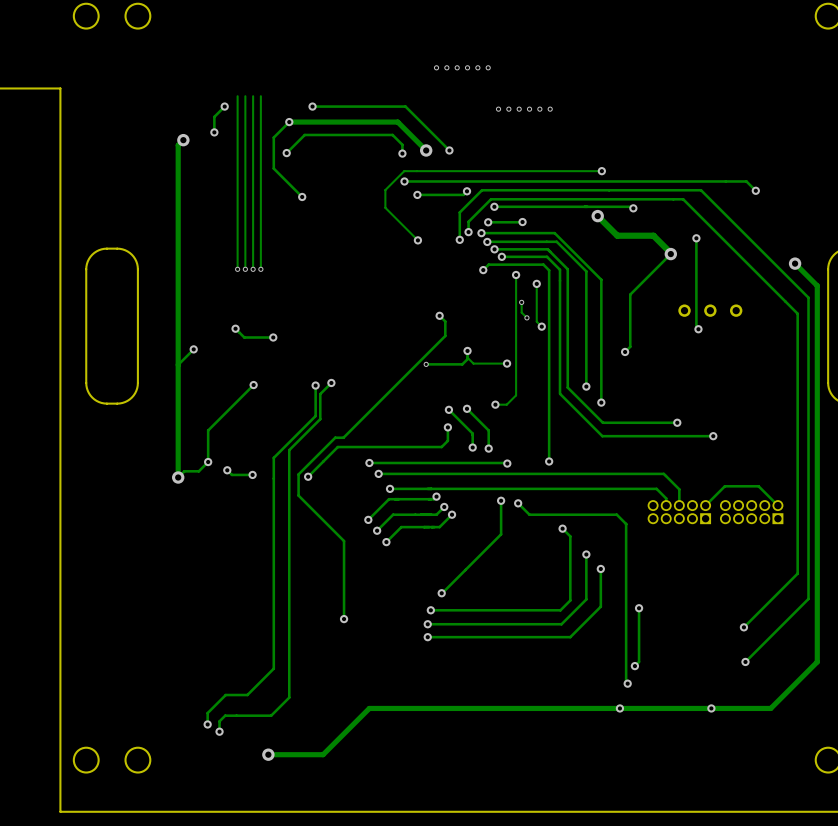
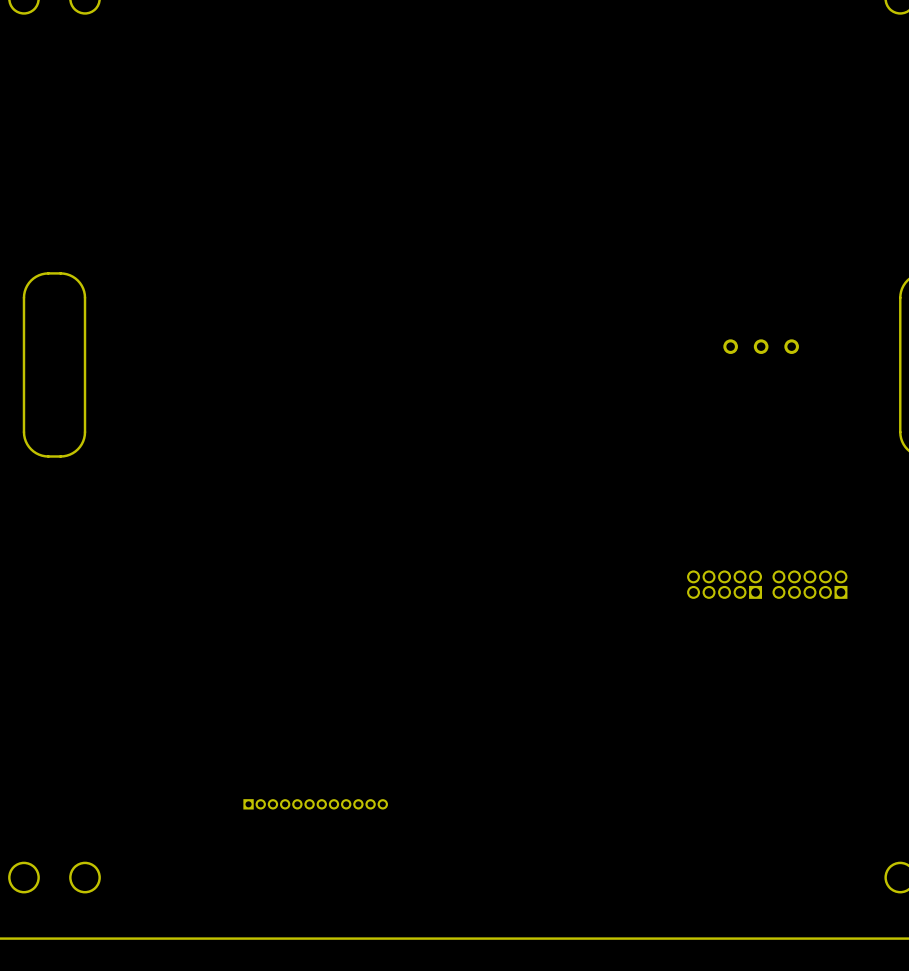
via: (436, 67) -> none
via: (446, 67) -> none
via: (457, 67) -> none
via: (467, 67) -> none
via: (477, 67) -> none
via: (488, 67) -> none
track: (237, 96) (237, 269) -> none
track: (245, 96) (245, 269) -> none
track: (253, 96) (253, 269) -> none
track: (260, 96) (260, 269) -> none
track: (224, 106) (214, 116) (214, 132) -> none
via: (224, 106) -> none
track: (312, 106) (405, 106) (449, 150) -> none
via: (312, 106) -> none
via: (498, 109) -> none
via: (508, 109) -> none
via: (519, 109) -> none
via: (529, 109) -> none
via: (539, 109) -> none
via: (550, 109) -> none
via: (289, 122) -> none
via: (214, 132) -> none
track: (183, 140) (178, 145) (178, 477) (184, 471) (198, 471) (208, 462) (208, 430) (253, 385) -> none
via: (183, 140) -> none
track: (426, 150) (397, 122) (289, 122) (273, 137) (273, 168) (302, 196) -> none
via: (426, 150) -> none
via: (449, 150) -> none
track: (286, 153) (304, 134) (392, 134) (402, 144) (402, 153) -> none
via: (286, 153) -> none
via: (402, 153) -> none
track: (601, 171) (404, 171) (385, 190) (385, 207) (417, 240) -> none
via: (601, 171) -> none
track: (404, 181) (746, 181) (755, 190) -> none
via: (404, 181) -> none
via: (755, 190) -> none
track: (467, 191) (463, 194) (417, 194) -> none
via: (467, 191) -> none
via: (417, 194) -> none
via: (302, 196) -> none
track: (494, 206) (631, 206) (633, 208) -> none
via: (494, 206) -> none
via: (633, 208) -> none
track: (597, 215) (617, 235) (653, 235) (670, 253) (630, 294) (630, 346) (625, 351) -> none
via: (597, 216) -> none
via: (488, 222) -> none
track: (522, 222) (488, 222) -> none
via: (522, 222) -> none
track: (468, 232) (468, 221) (491, 199) (683, 199) (797, 313) (797, 573) (743, 627) -> none
via: (468, 232) -> none
track: (481, 233) (554, 233) (601, 279) (601, 402) -> none
via: (481, 233) -> none
track: (696, 238) (696, 327) (698, 329) -> none
via: (696, 238) -> none
track: (459, 239) (459, 212) (481, 190) (701, 190) (808, 297) (808, 598) (745, 661) -> none
via: (459, 239) -> none
via: (417, 240) -> none
track: (487, 241) (556, 241) (586, 271) (586, 386) -> none
via: (487, 241) -> none
track: (494, 249) (547, 249) (567, 269) (567, 387) (602, 422) (677, 422) -> none
via: (494, 249) -> none
via: (670, 254) -> none
track: (501, 256) (547, 256) (560, 269) (560, 393) -> none
via: (501, 256) -> none
track: (795, 263) (817, 285) (817, 661) (770, 708) (369, 708) (323, 754) (268, 754) -> none
via: (795, 263) -> none
via: (237, 269) -> none
via: (245, 269) -> none
via: (253, 269) -> none
via: (260, 269) -> none
track: (483, 270) (488, 264) (543, 264) (549, 270) (549, 461) -> none
via: (483, 270) -> none
track: (516, 274) (516, 395) (506, 404) (495, 404) -> none
via: (516, 274) -> none
track: (536, 283) (536, 321) (541, 326) -> none
via: (536, 283) -> none
track: (521, 302) (521, 312) (526, 317) -> none
via: (521, 302) -> none
track: (439, 315) (445, 321) (445, 335) (343, 437) (335, 437) (298, 474) (298, 495) (344, 541) (344, 619) -> none
via: (439, 315) -> none
via: (526, 317) -> none
via: (541, 326) -> none
track: (235, 328) (244, 337) (273, 337) -> none
via: (235, 328) -> none
via: (698, 329) -> none
via: (273, 337) -> none
track: (193, 349) (178, 364) -> none
via: (193, 349) -> none
via: (467, 350) -> none
via: (625, 351) -> none
track: (507, 363) (473, 363) (467, 357) (467, 350) (467, 359) (462, 364) (426, 364) -> none
via: (507, 363) -> none
via: (426, 364) -> none
track: (331, 382) (320, 394) (320, 419) (289, 450) (289, 697) (271, 715) (225, 715) (219, 721) (219, 731) -> none
via: (331, 382) -> none
via: (253, 385) -> none
track: (315, 385) (315, 416) (273, 457) (273, 668) (247, 695) (225, 695) (207, 713) (207, 724) -> none
via: (315, 385) -> none
via: (586, 386) -> none
track: (560, 394) (602, 436) (713, 436) -> none
via: (601, 402) -> none
via: (495, 404) -> none
track: (467, 408) (488, 430) (488, 448) -> none
via: (467, 408) -> none
track: (448, 409) (472, 433) (472, 447) -> none
via: (448, 409) -> none
via: (677, 422) -> none
track: (447, 427) (447, 440) (441, 447) (337, 447) (308, 476) -> none
via: (447, 427) -> none
via: (713, 436) -> none
via: (472, 447) -> none
via: (488, 448) -> none
via: (549, 461) -> none
via: (208, 462) -> none
track: (369, 462) (507, 463) -> none
via: (369, 462) -> none
via: (507, 463) -> none
track: (227, 470) (231, 474) (252, 474) -> none
via: (227, 470) -> none
track: (378, 473) (663, 473) (679, 489) (679, 505) -> none
via: (378, 473) -> none
via: (252, 474) -> none
via: (308, 476) -> none
via: (178, 477) -> none
track: (390, 488) (656, 488) (666, 498) (666, 505) -> none
via: (390, 488) -> none
track: (436, 496) (433, 499) (389, 499) (368, 519) -> none
via: (436, 496) -> none
track: (501, 500) (501, 534) (441, 593) -> none
via: (501, 500) -> none
track: (518, 503) (529, 514) (616, 514) (626, 524) (626, 682) (627, 683) -> none
via: (518, 503) -> none
track: (777, 505) (758, 486) (724, 486) (705, 505) -> none
track: (444, 506) (436, 514) (393, 514) (377, 530) -> none
via: (444, 506) -> none
track: (452, 514) (439, 527) (401, 527) (386, 542) -> none
via: (452, 514) -> none
via: (368, 519) -> none
track: (562, 528) (570, 536) (570, 600) (560, 610) (430, 610) -> none
via: (562, 528) -> none
via: (377, 530) -> none
via: (386, 542) -> none
track: (586, 554) (586, 599) (561, 624) (427, 624) -> none
via: (586, 554) -> none
track: (600, 568) (600, 606) (570, 637) (427, 637) -> none
via: (600, 568) -> none
via: (441, 593) -> none
track: (639, 608) (639, 661) (634, 666) -> none
via: (639, 608) -> none
via: (430, 610) -> none
via: (344, 619) -> none
via: (427, 624) -> none
via: (743, 627) -> none
via: (427, 637) -> none
via: (745, 661) -> none
via: (634, 666) -> none
via: (627, 683) -> none
part: none -> (315, 804)
via: (619, 708) -> none
via: (711, 708) -> none
via: (207, 724) -> none
via: (219, 731) -> none
via: (268, 754) -> none

